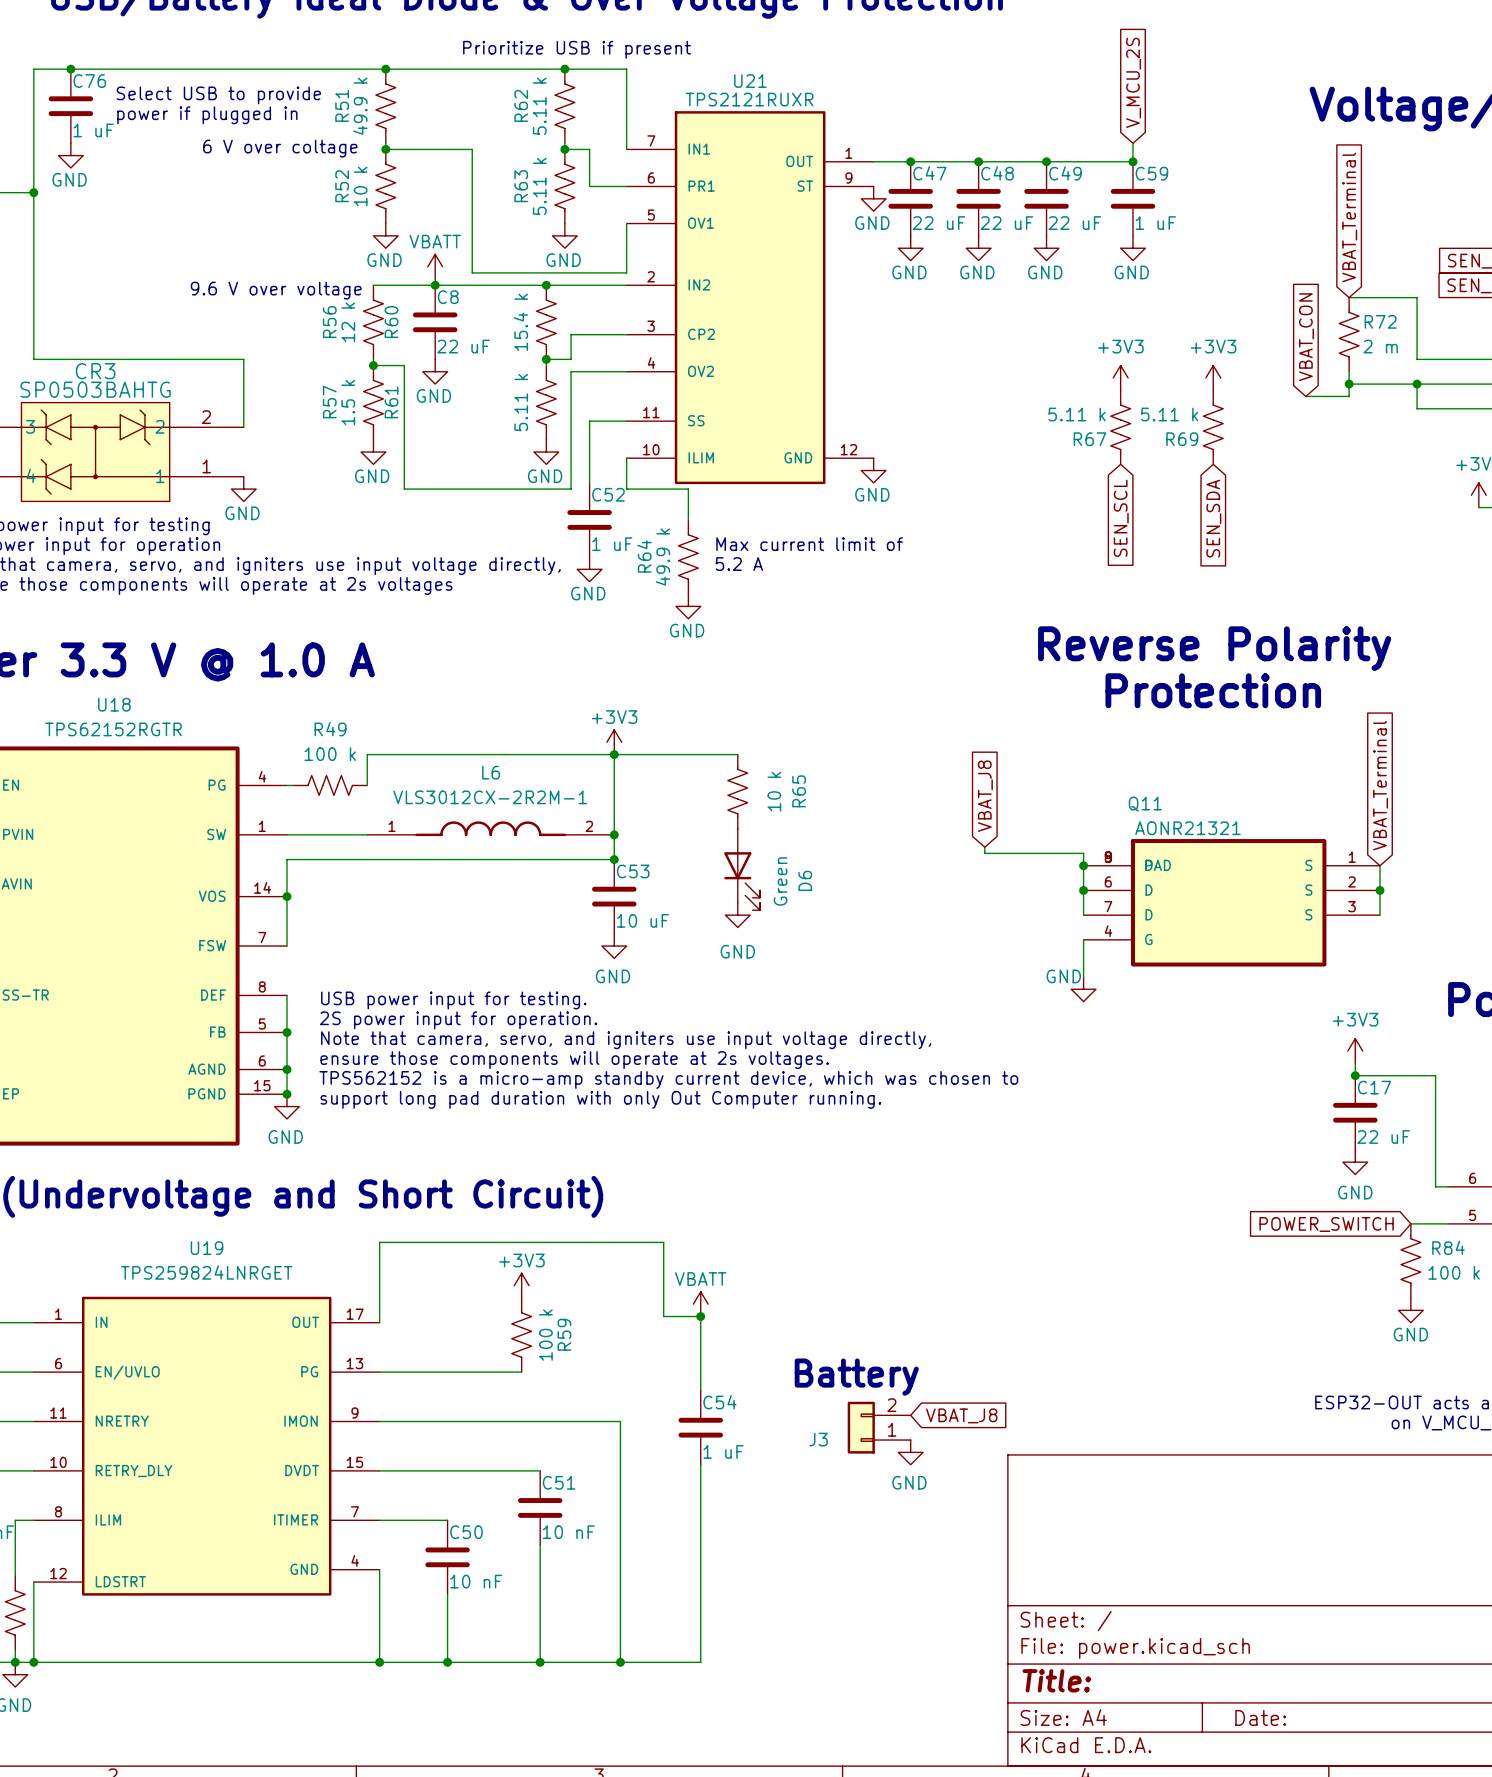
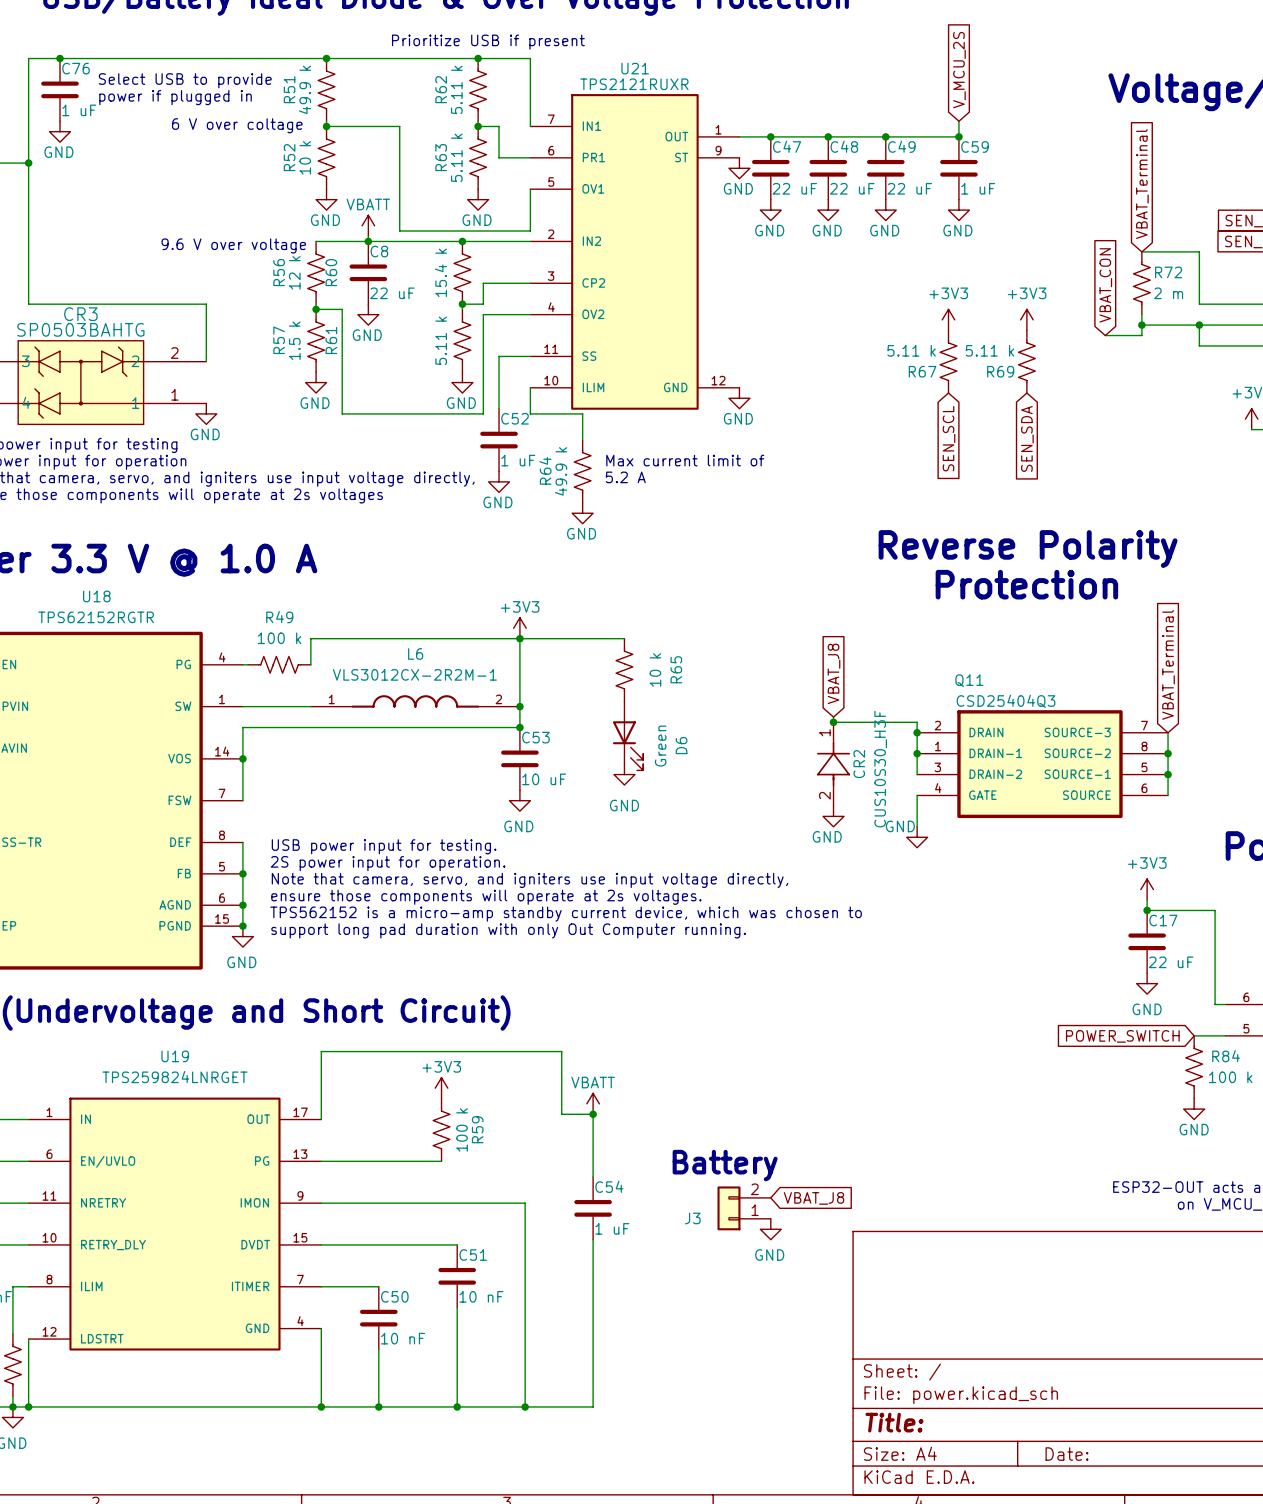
Q11 value: AONR21321 (1187, 828) -> CSD25404Q3 (1005, 701)
Q11 symbol: [1083, 839, 1381, 967] -> [917, 710, 1169, 819]
junction: none -> (833, 722)
CR2: none -> CUS10S30_H3F (833, 764)
wire: none -> (1168, 774) (1168, 795)
junction: none -> (1168, 774)
power symbol: none -> GND (833, 816)

